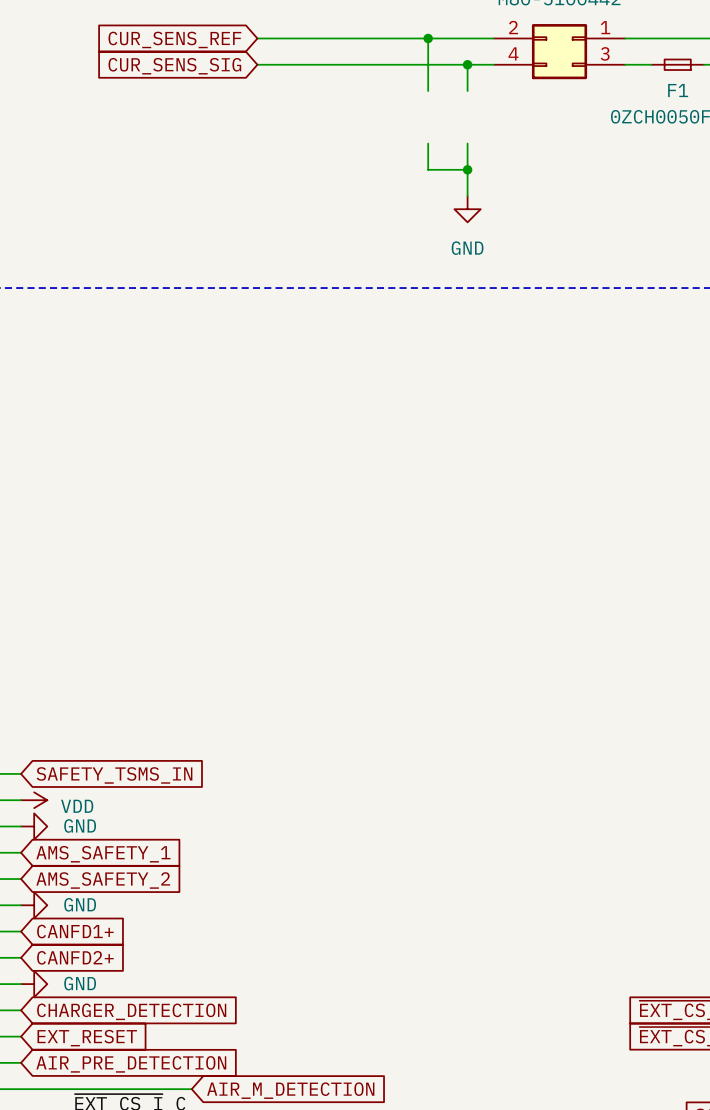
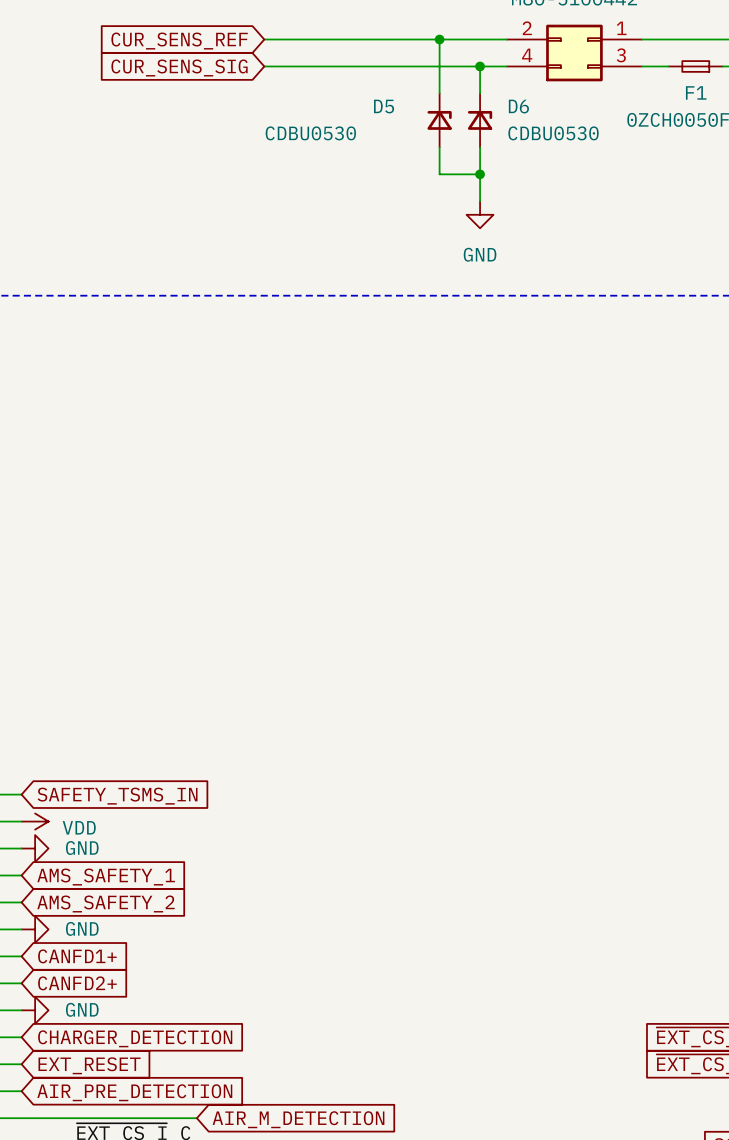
D5: none -> CDBU0530 (439, 120)
D6: none -> CDBU0530 (480, 120)

